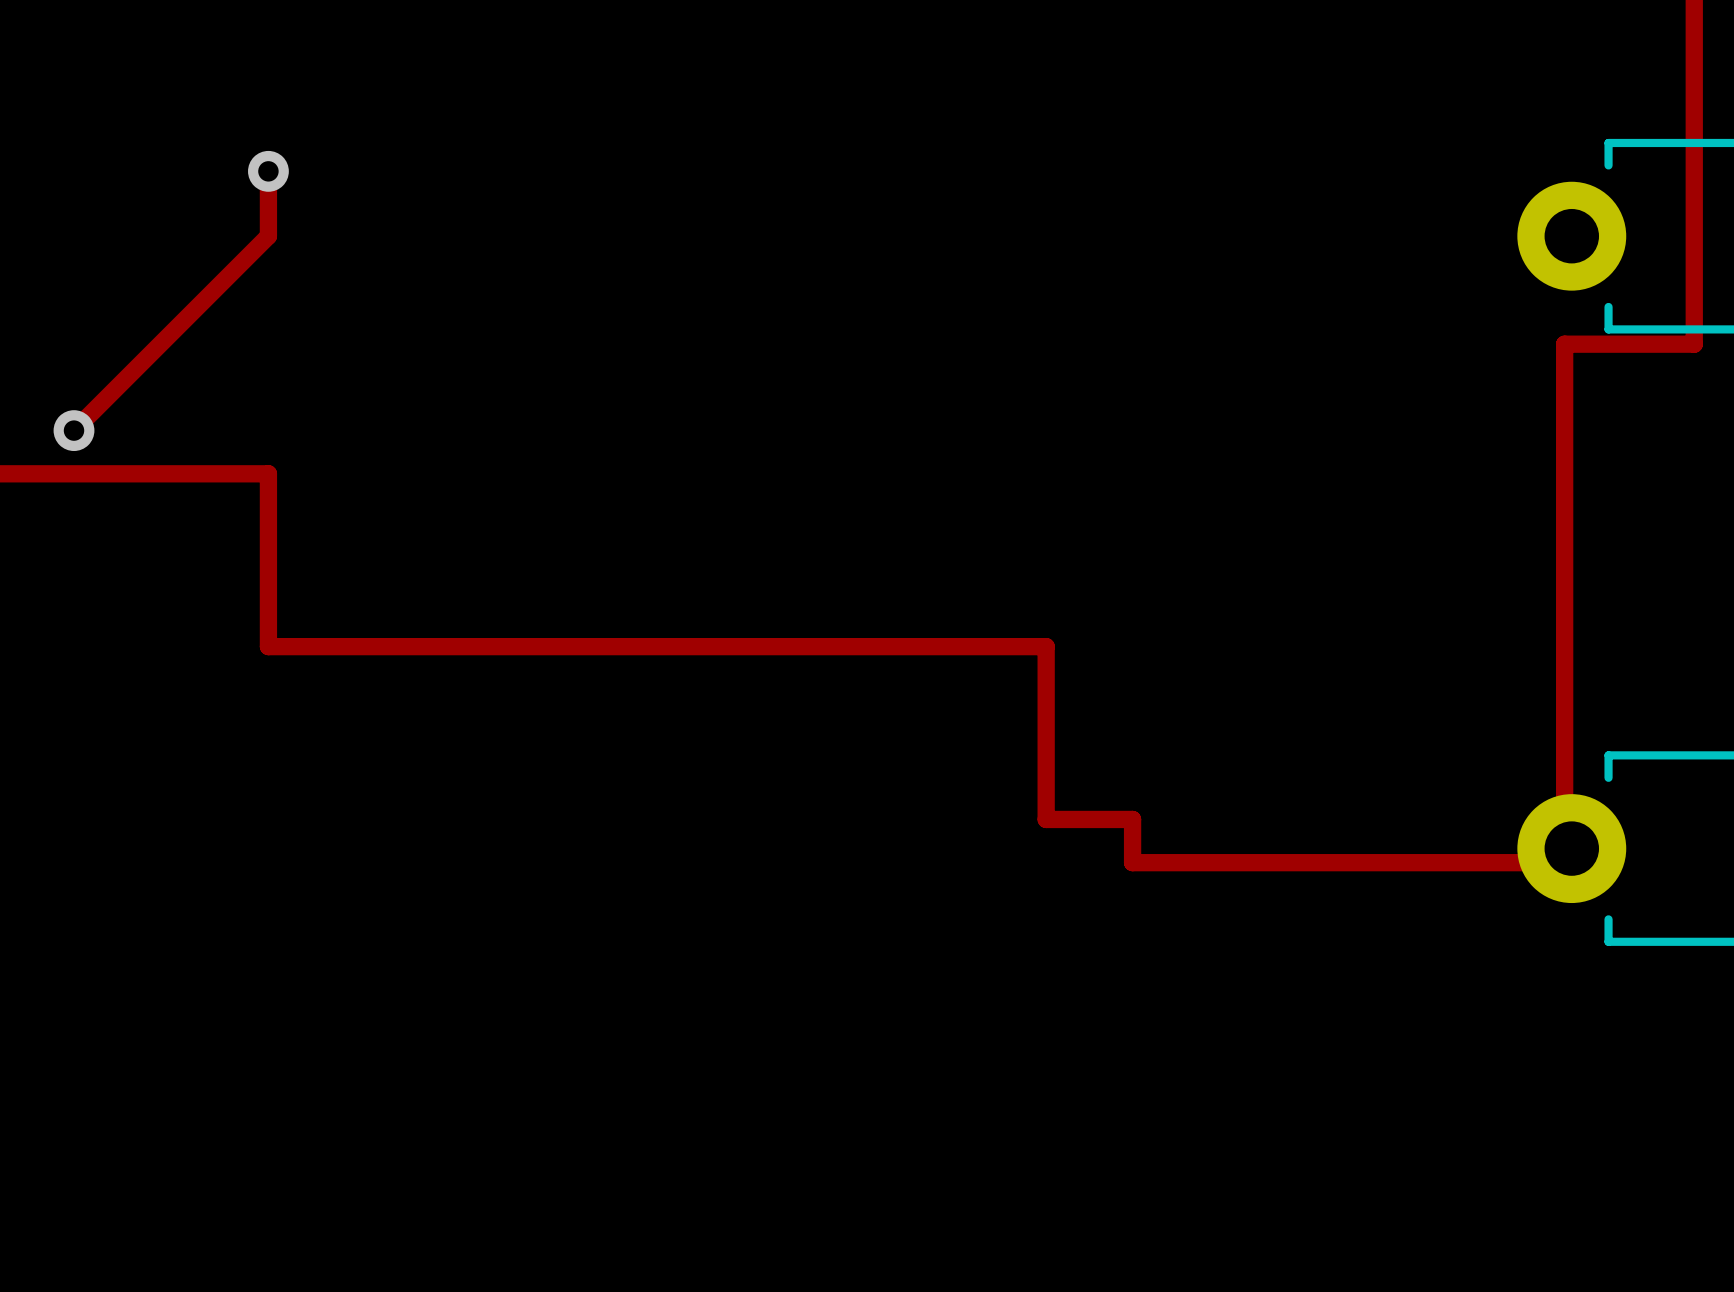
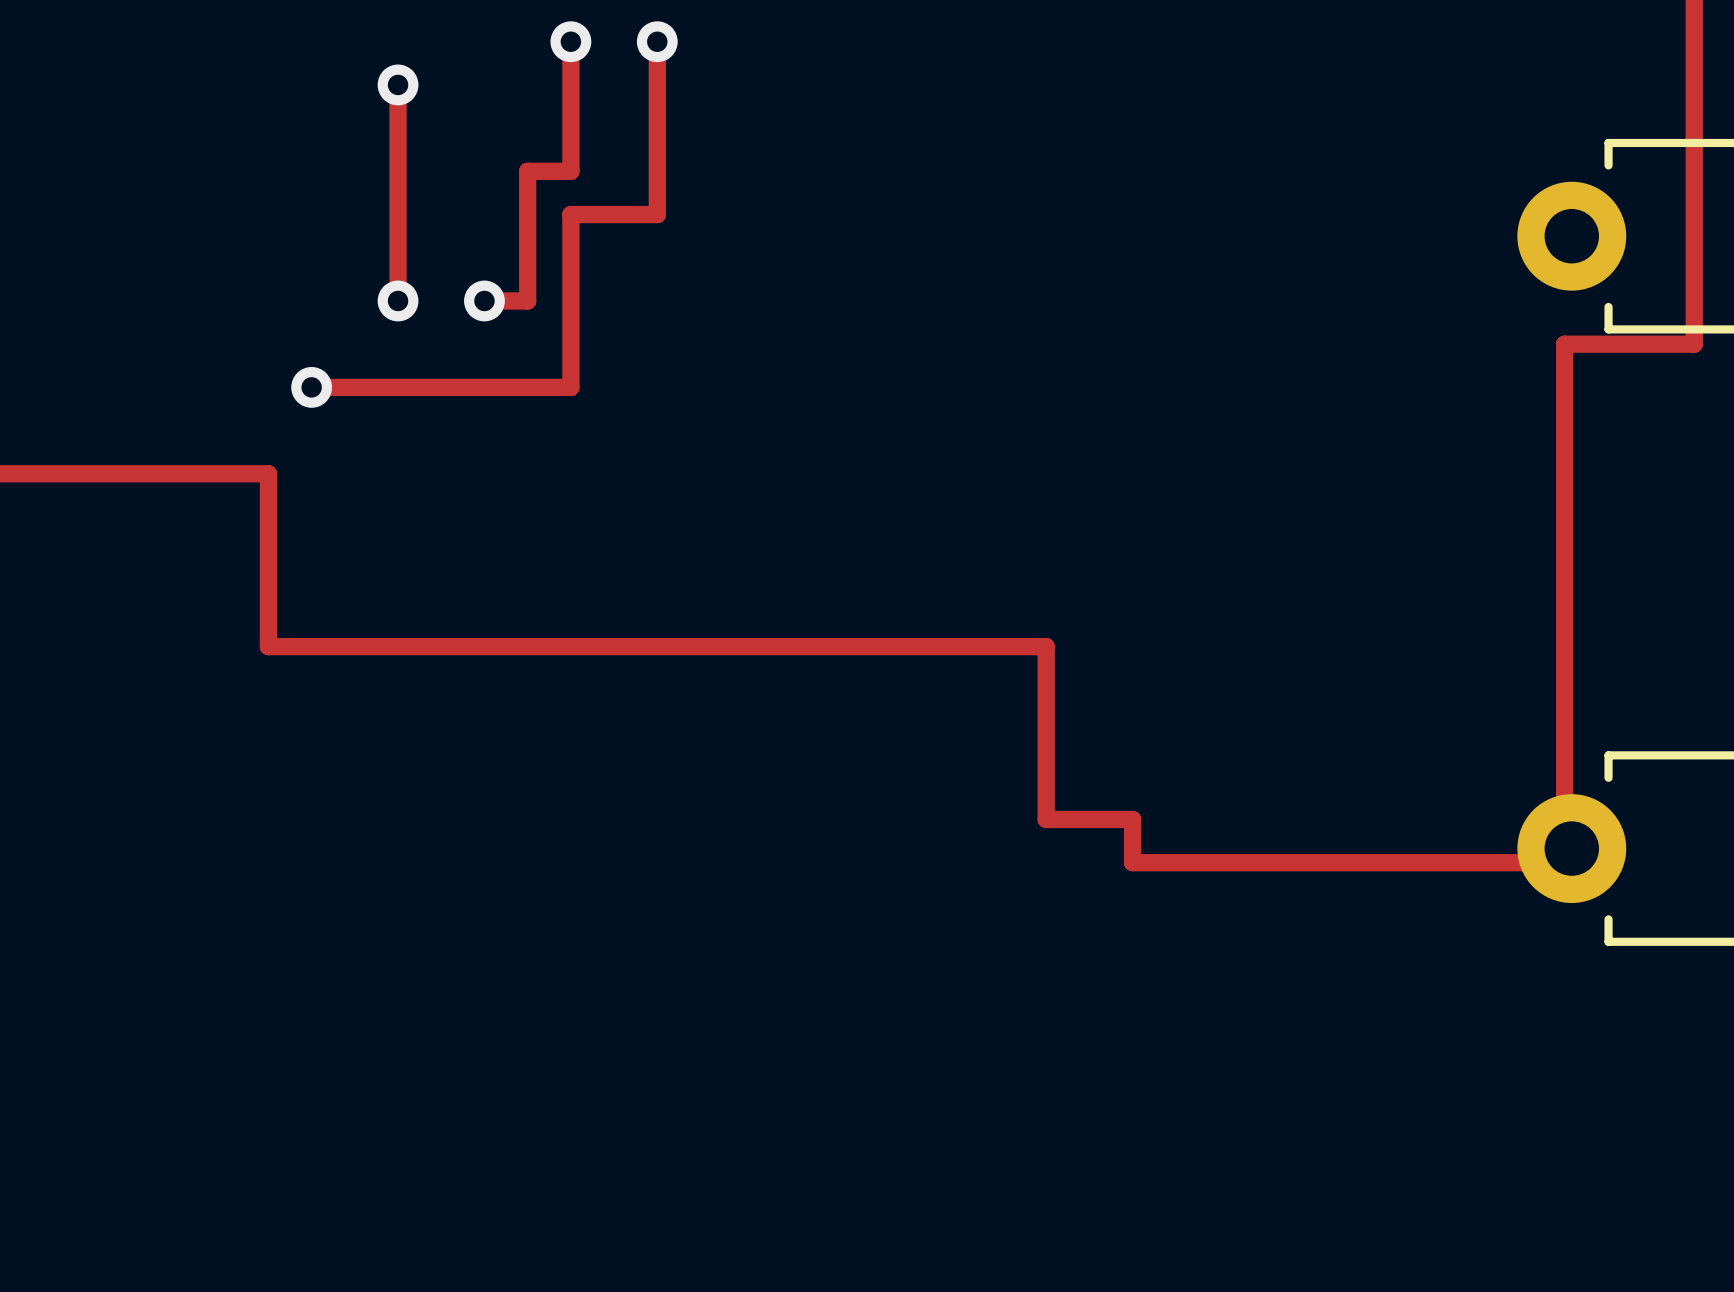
track: none -> (570, 41) (570, 171) (527, 171) (527, 300) (484, 300)
via: none -> (570, 41)
track: none -> (657, 41) (657, 214) (570, 214) (570, 387) (311, 387)
via: none -> (657, 41)
track: none -> (398, 84) (398, 300)
via: none -> (398, 84)
track: (268, 171) (268, 236) (74, 430) -> none
via: (268, 171) -> none
via: none -> (398, 300)
via: none -> (484, 300)
via: none -> (311, 387)
via: (74, 430) -> none

